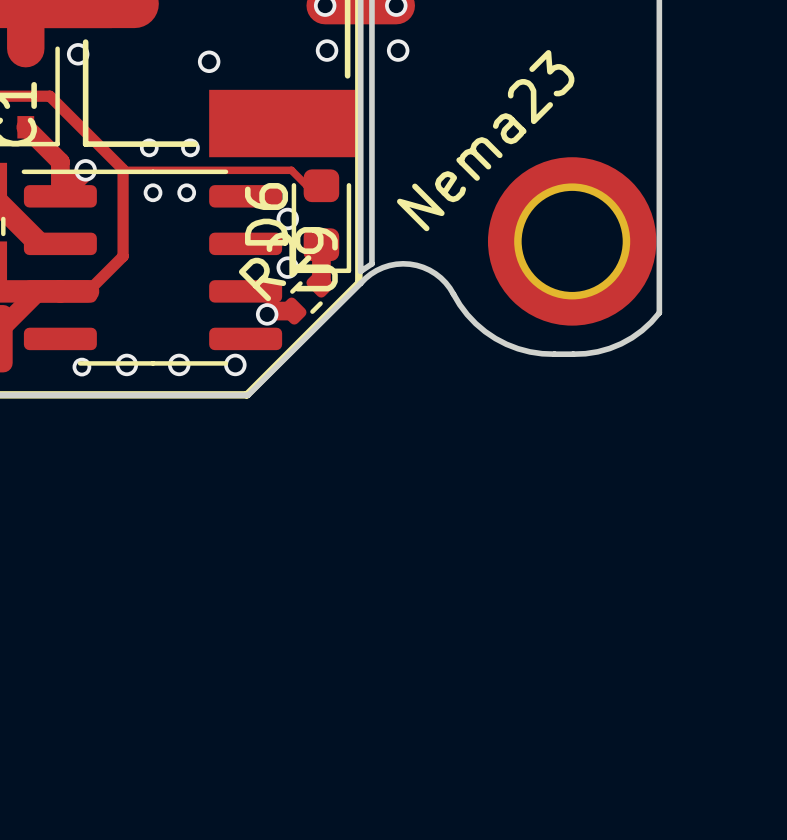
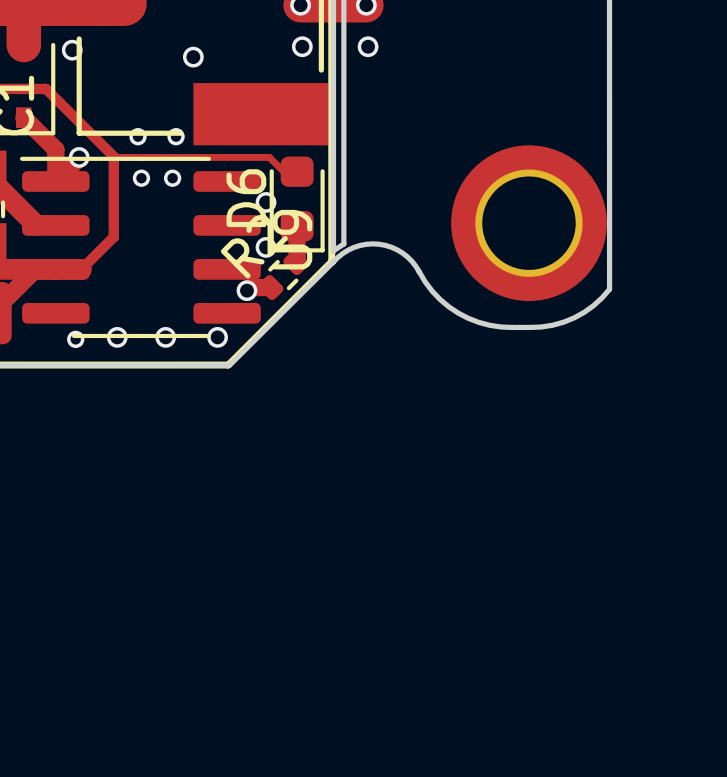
text: Nema23 (485, 140) -> none

